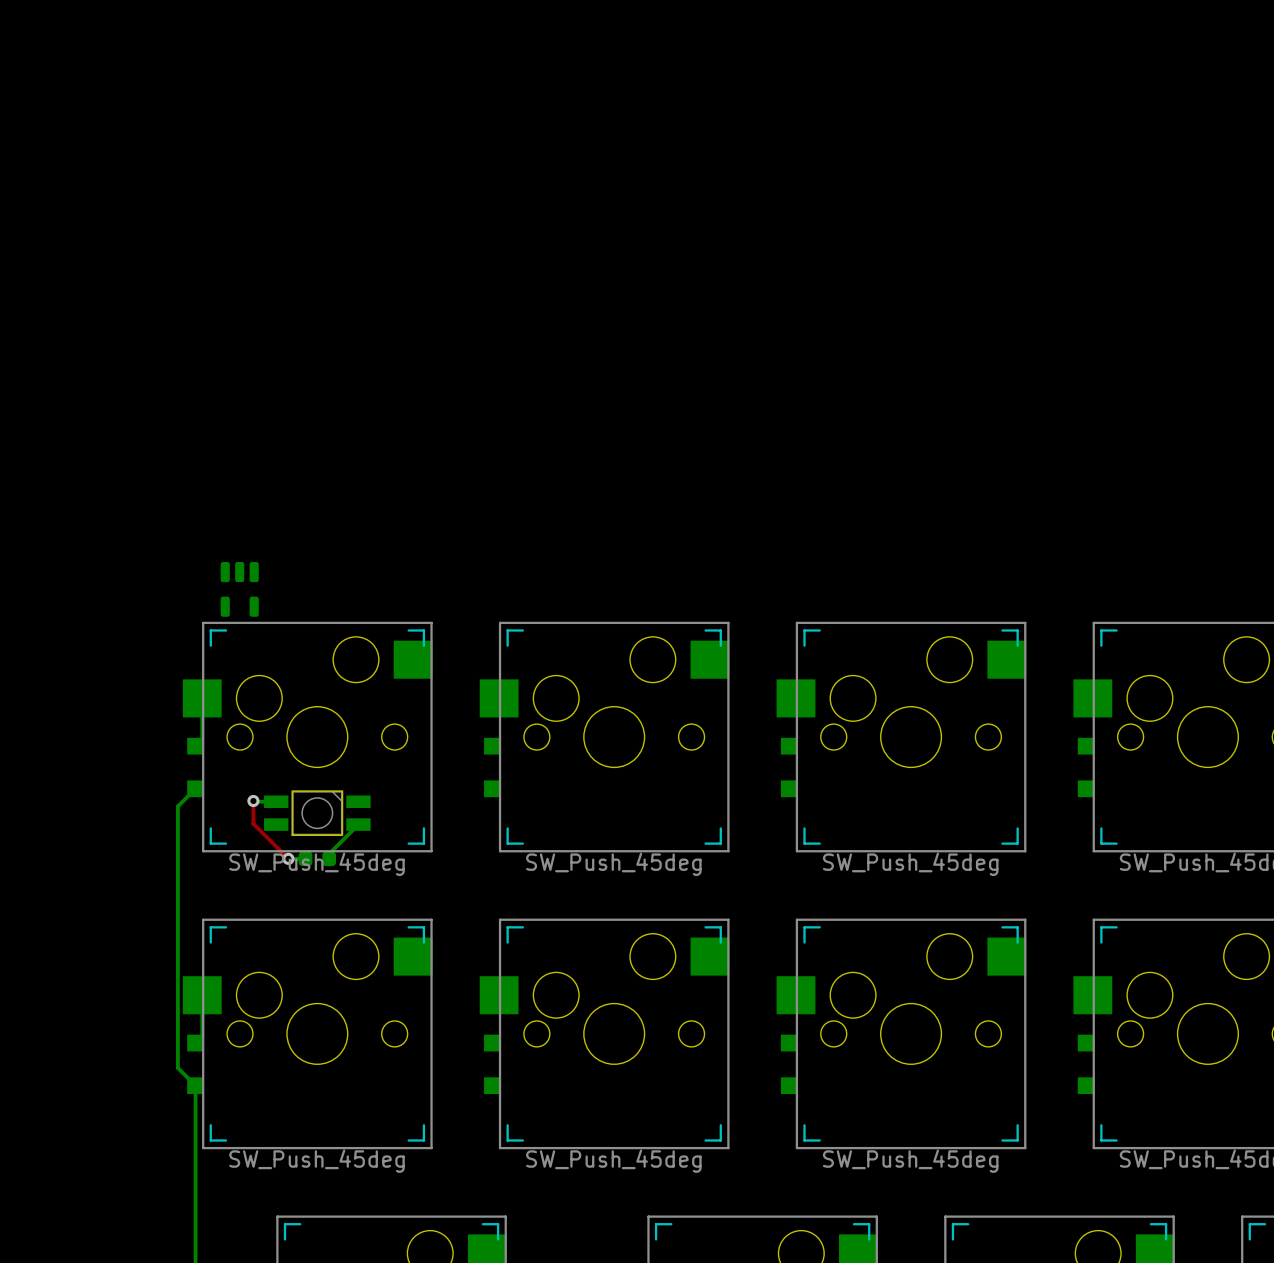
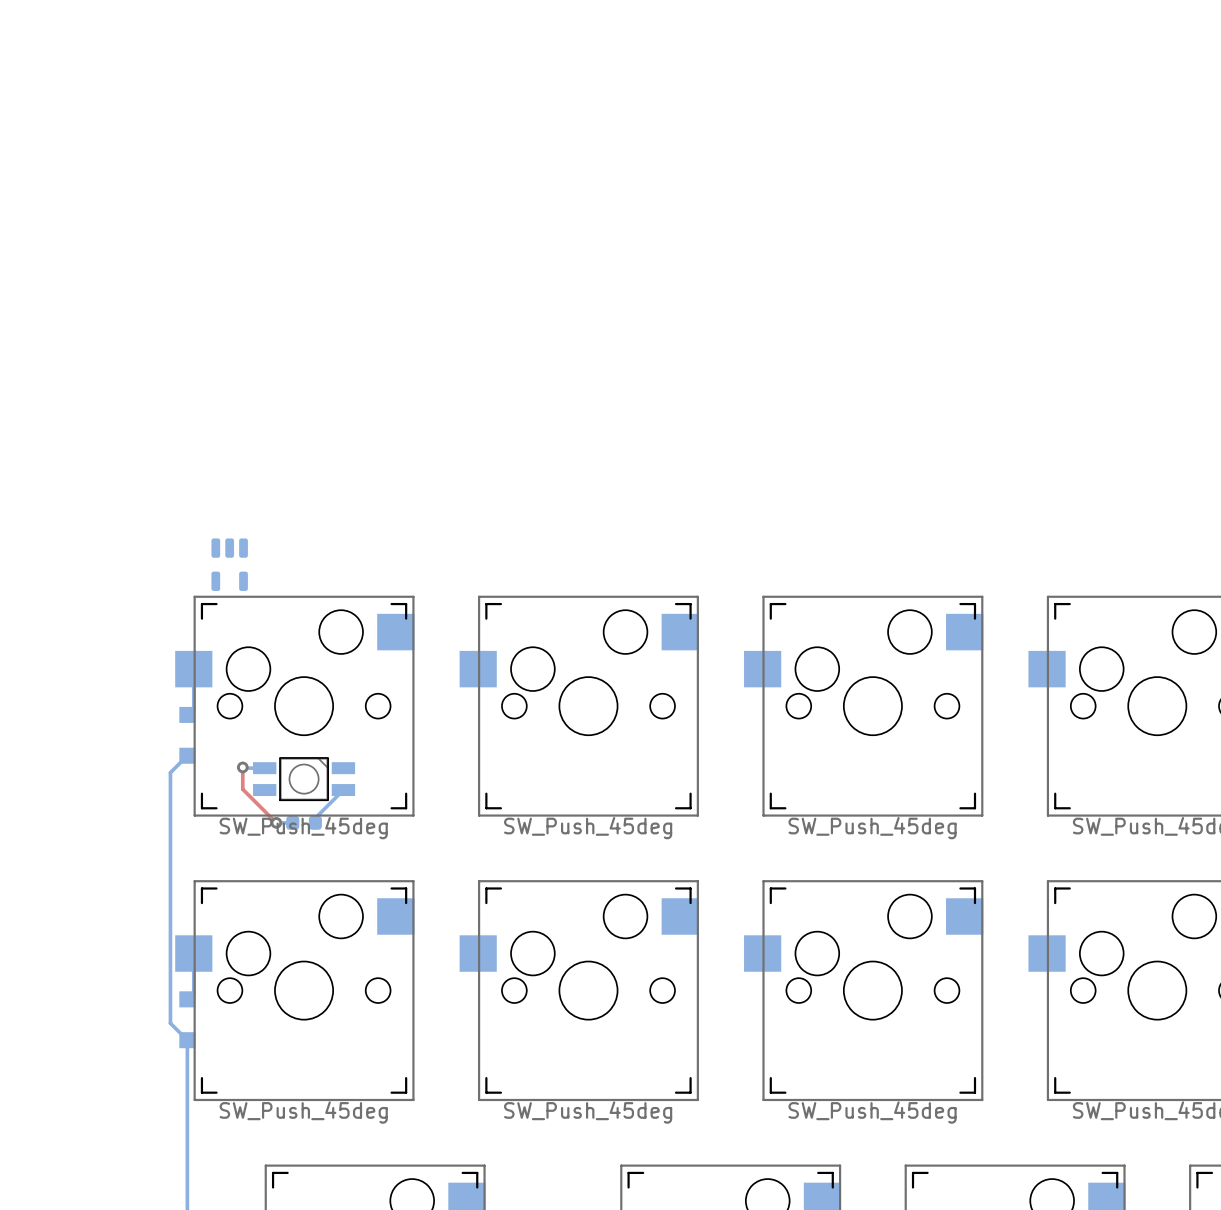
part: (492, 767) -> none
part: (789, 767) -> none
part: (1086, 767) -> none
part: (492, 1064) -> none
part: (789, 1064) -> none
part: (1086, 1064) -> none

